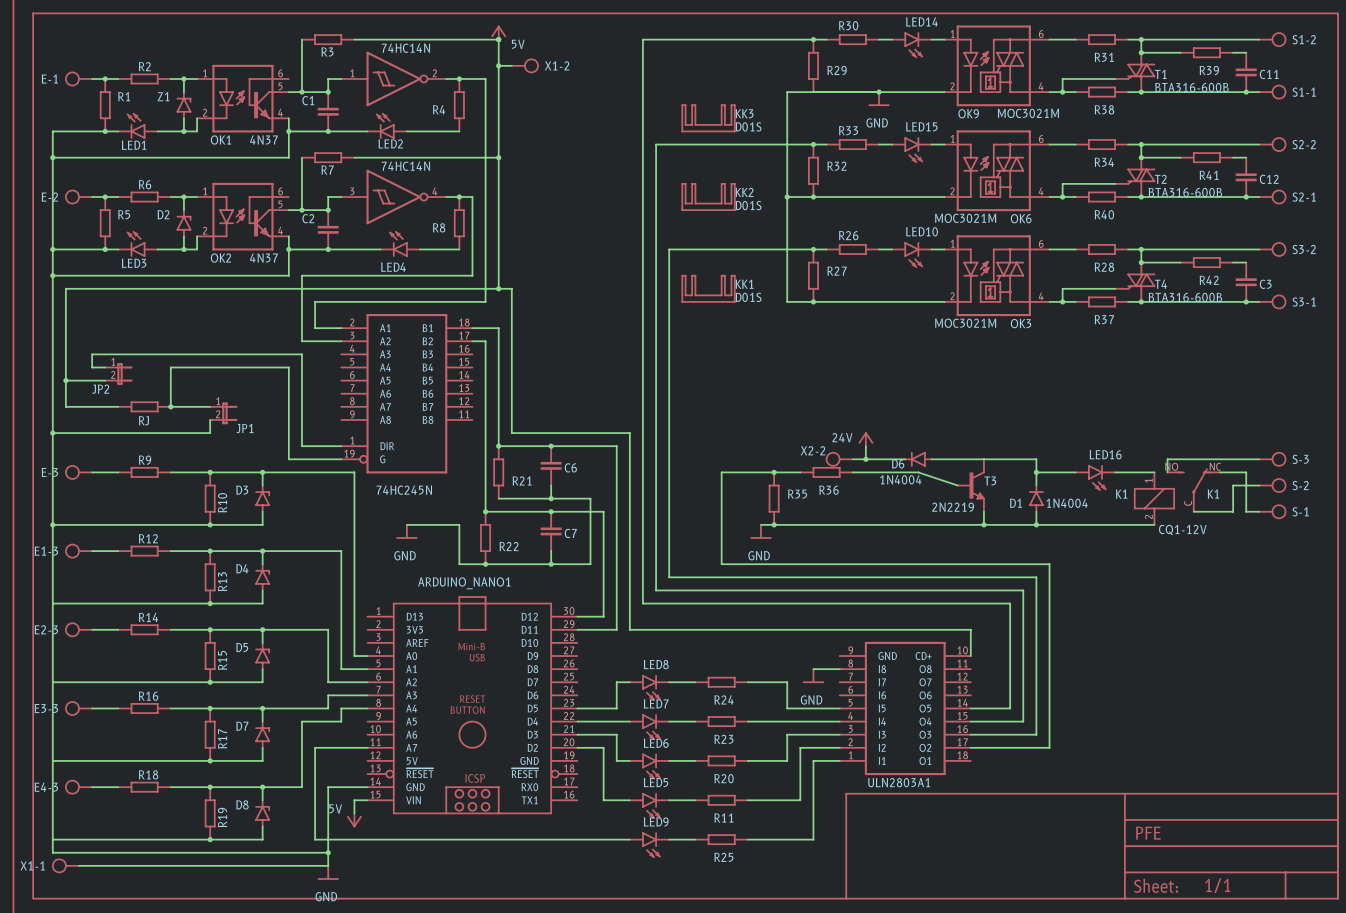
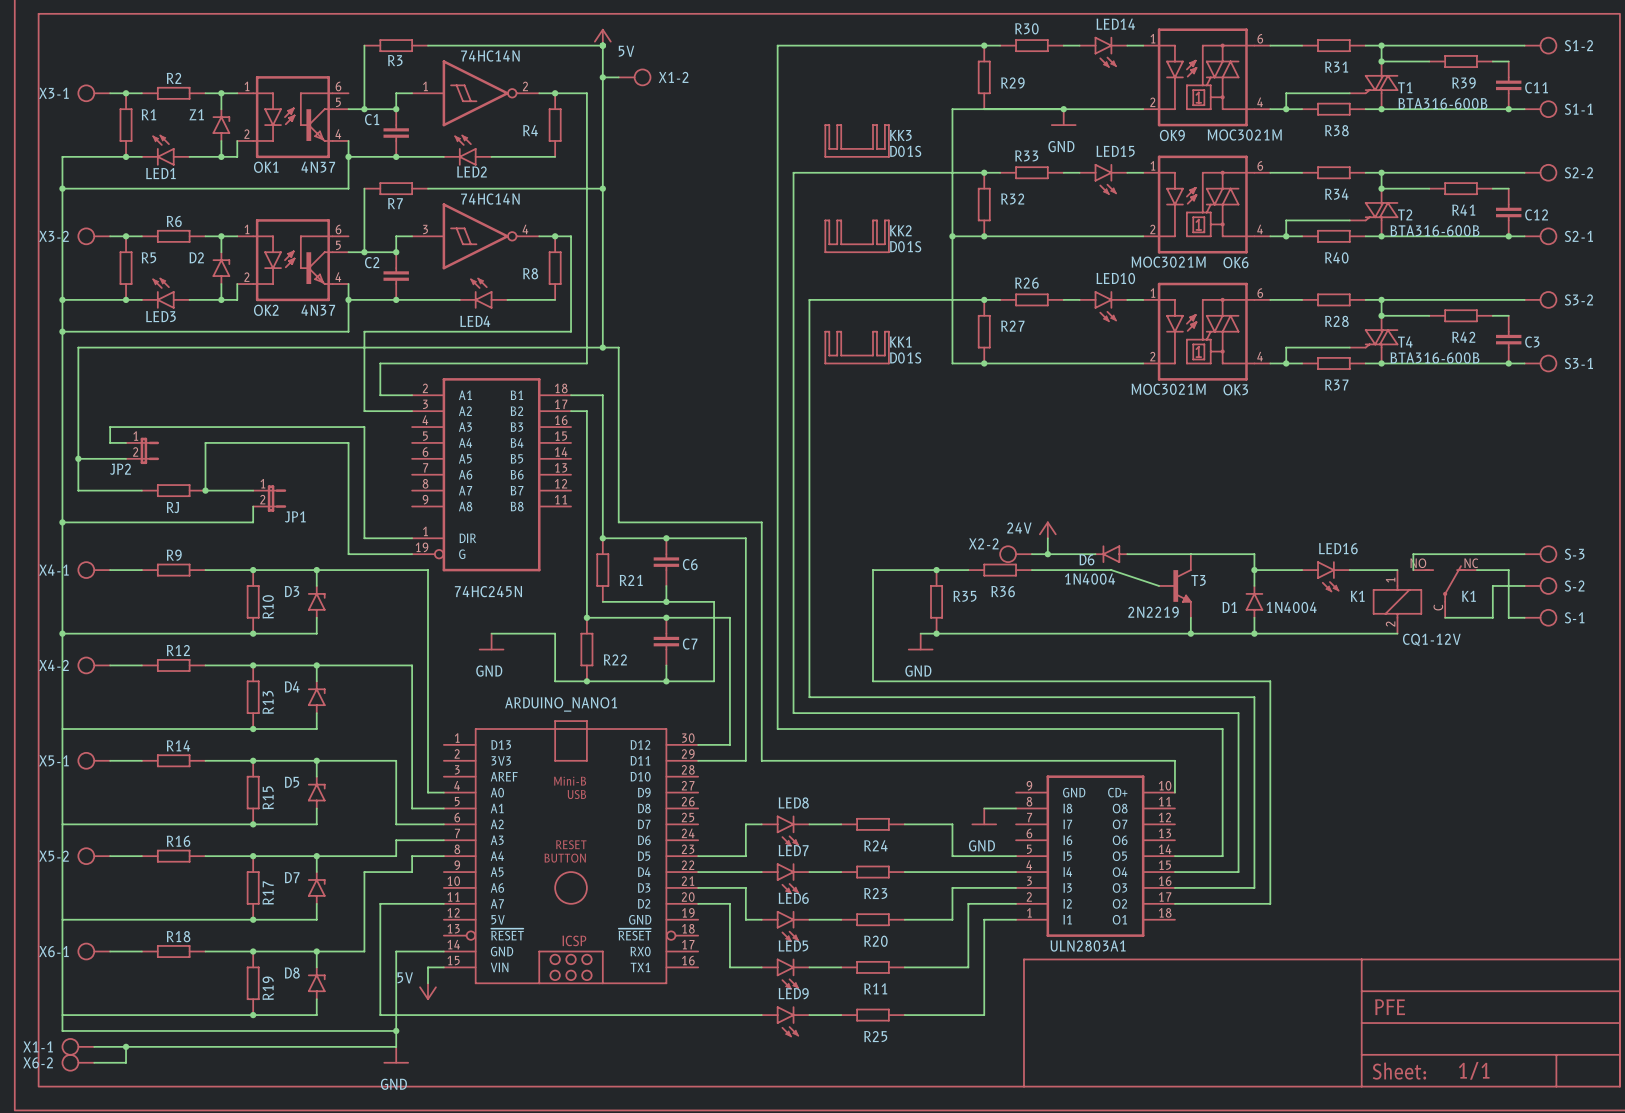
E-1 name: E-1 (49, 78) -> X3-1 (53, 93)
E-2 name: E-2 (49, 197) -> X3-2 (53, 236)
E-3 name: E-3 (49, 472) -> X4-1 (53, 570)
E1-3 name: E1-3 (46, 551) -> X4-2 (53, 665)
E2-3 name: E2-3 (46, 629) -> X5-1 (53, 760)
E3-3 name: E3-3 (46, 708) -> X5-2 (53, 856)
E4-3 name: E4-3 (46, 787) -> X6-1 (53, 951)
wire: none -> (126, 1046) (126, 1062) (94, 1062)
junction: none -> (126, 1046)
X6-2: none -> (77, 1062)

